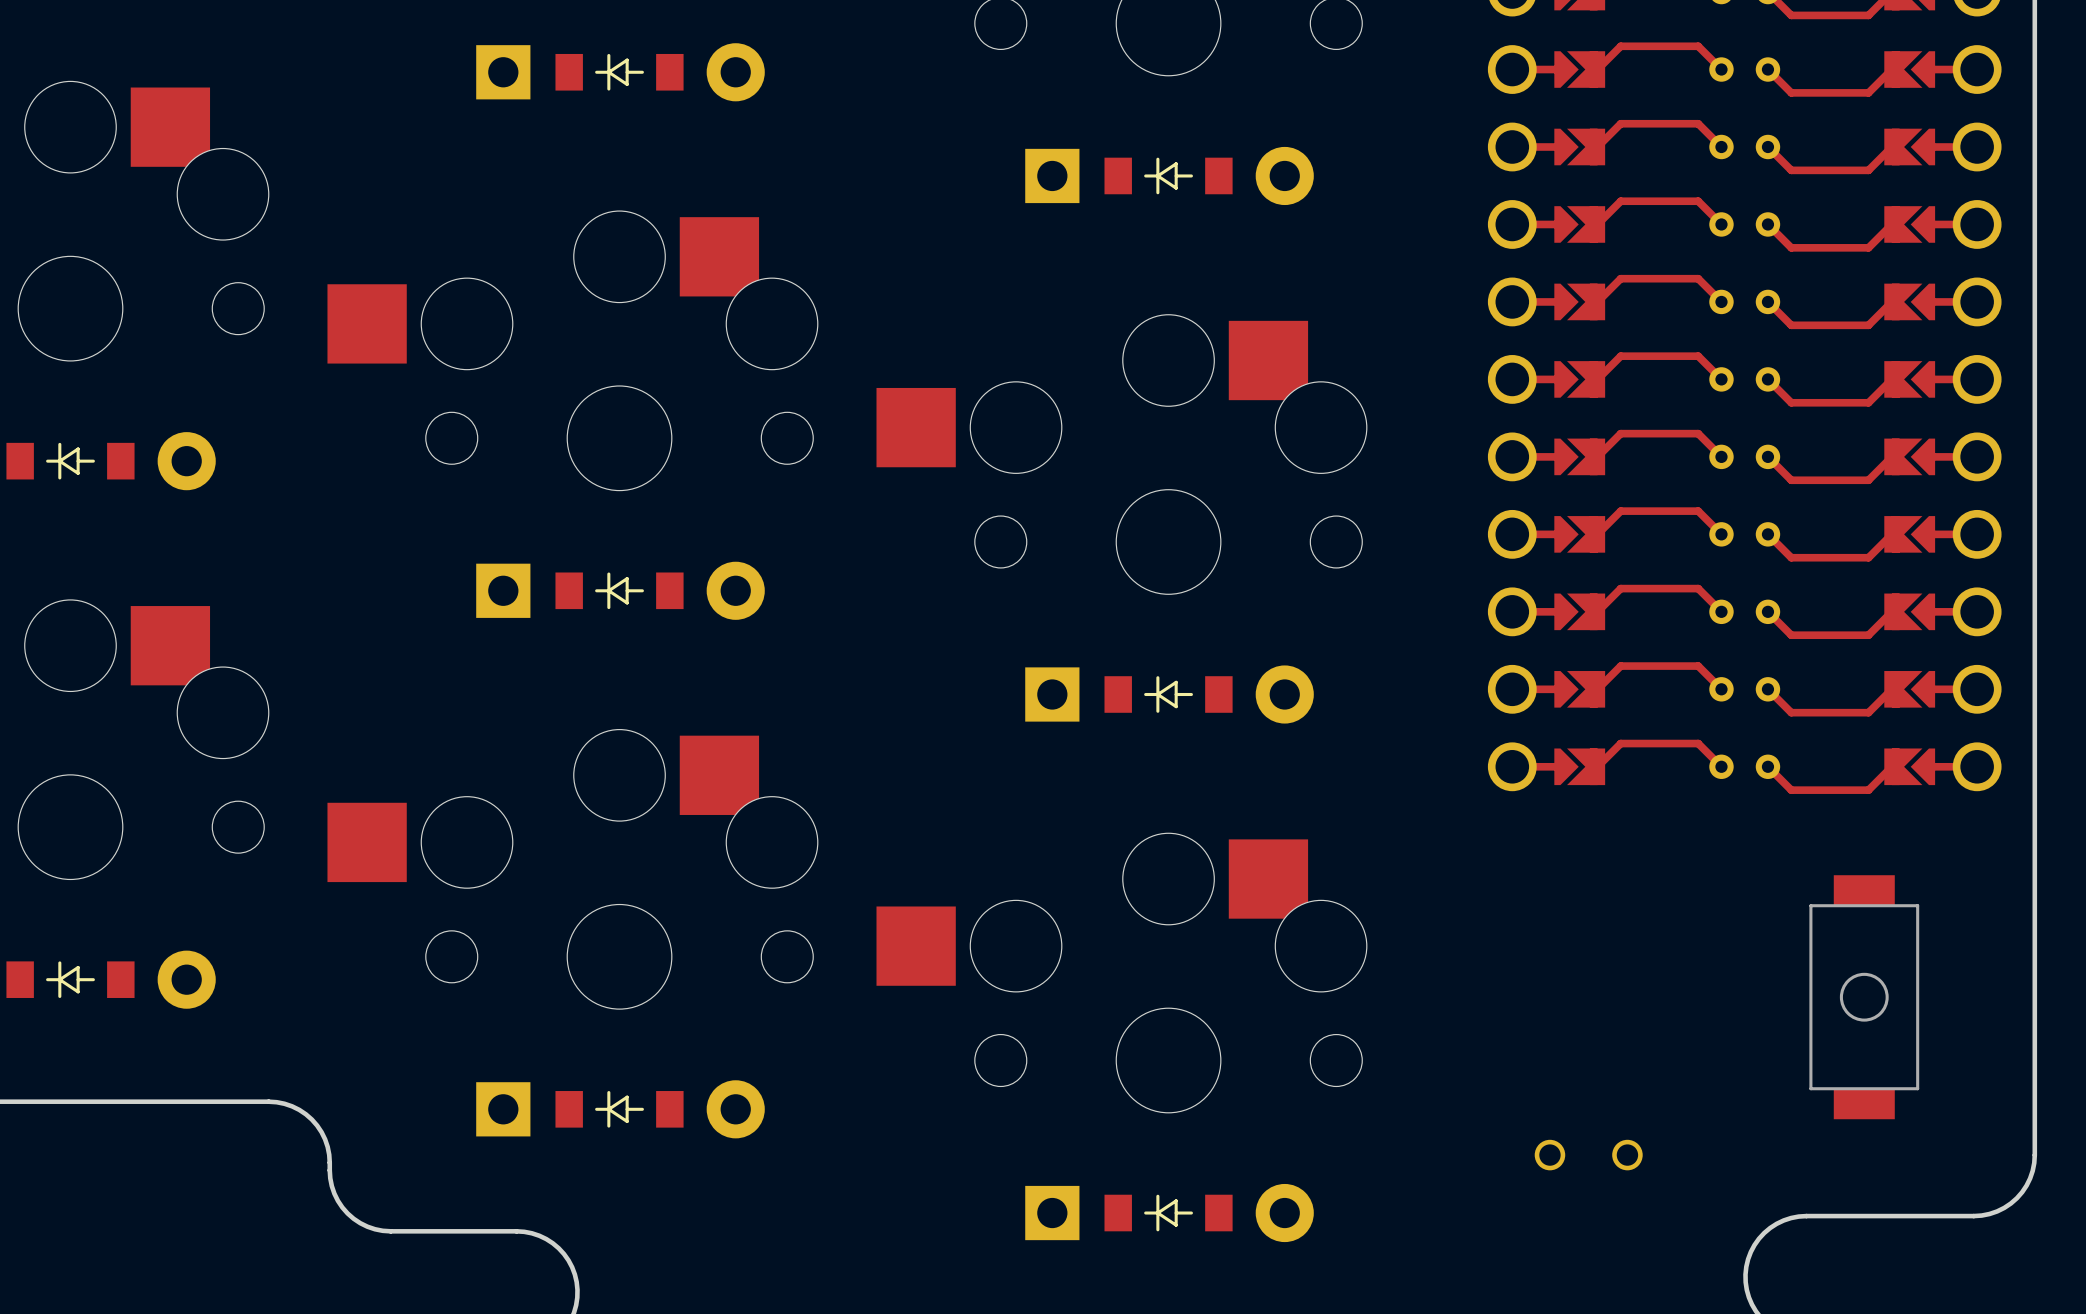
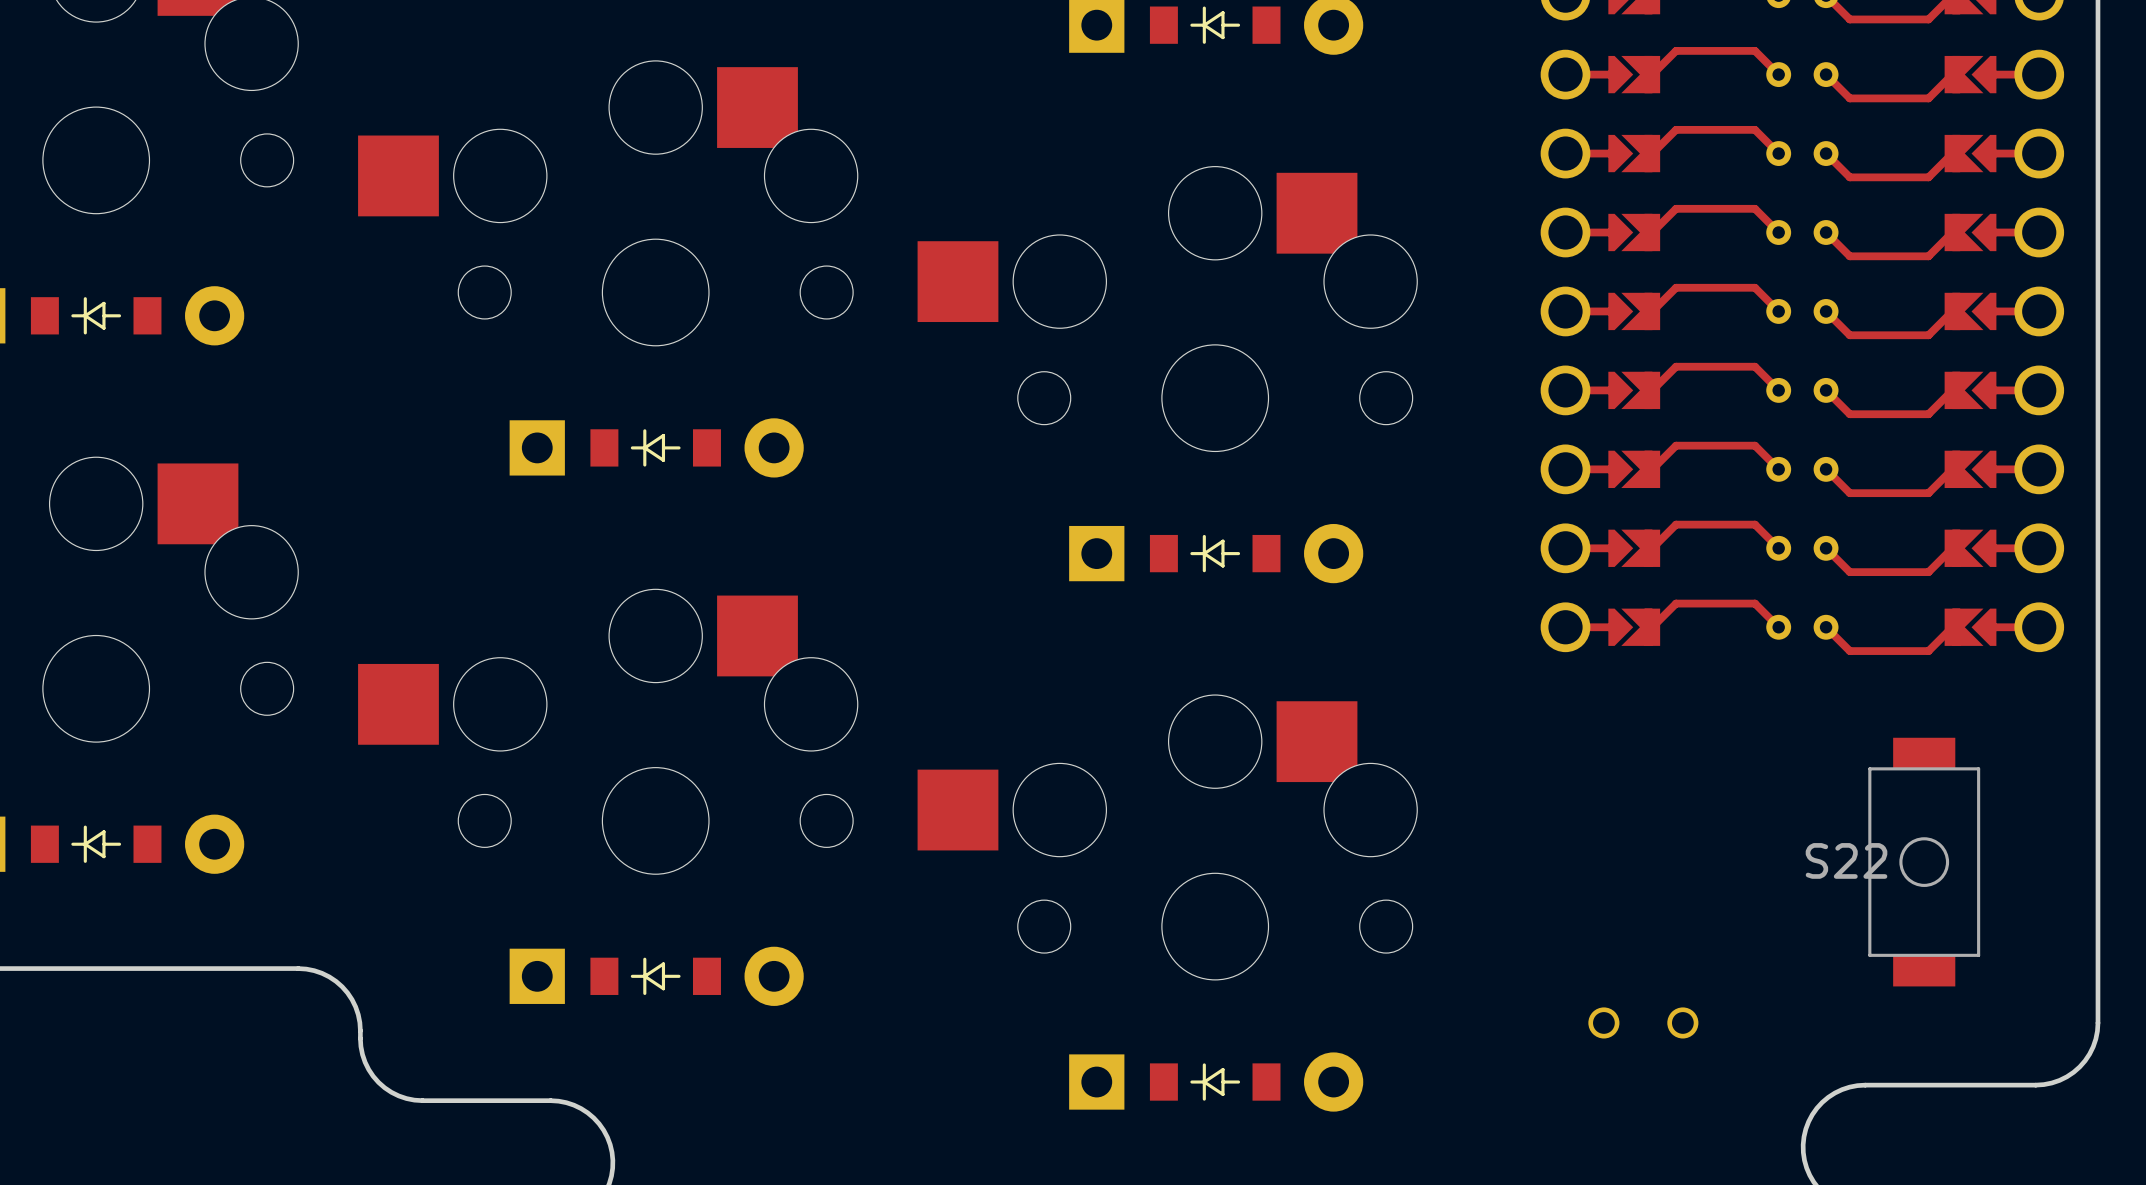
S22 name: none -> S22 (1846, 860)

